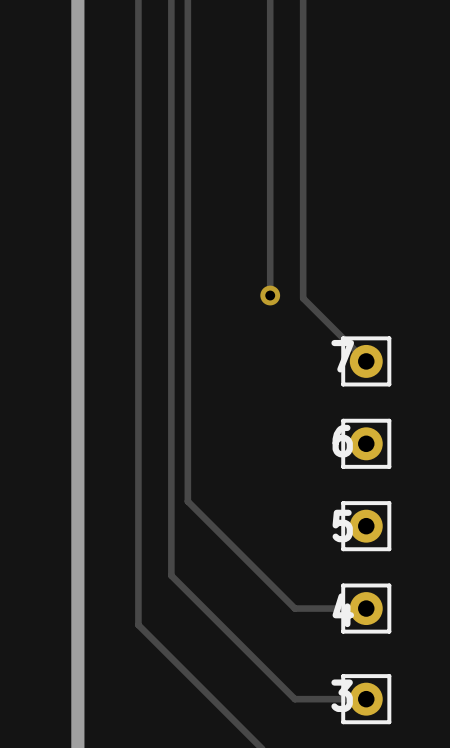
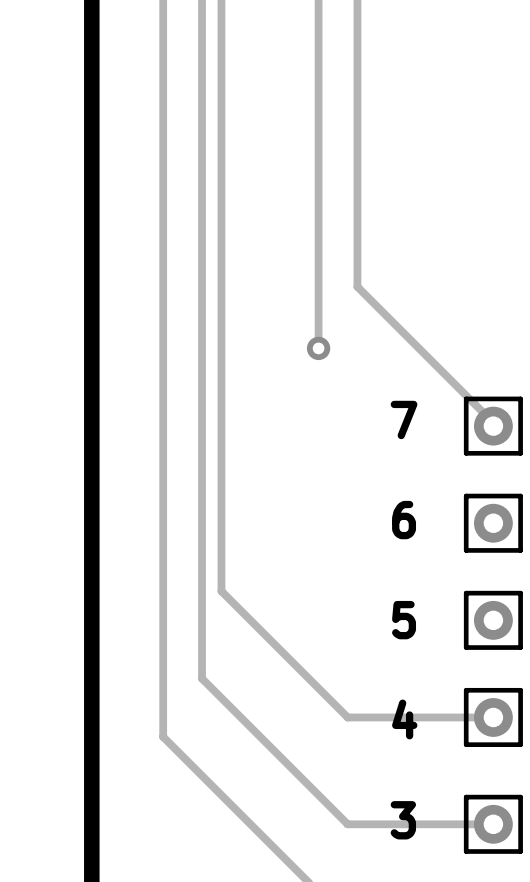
track: (303, 243) (303, 298) (366, 361) -> (357, 286) (496, 426)
part: (366, 361) -> none
part: none -> (493, 426)
part: (366, 443) -> none
part: none -> (493, 523)
part: (366, 526) -> none
part: none -> (493, 620)
part: (366, 608) -> none
track: none -> (493, 717) (431, 717)
part: none -> (493, 717)
part: (366, 699) -> none
track: none -> (493, 824) (431, 824)
part: none -> (493, 824)

